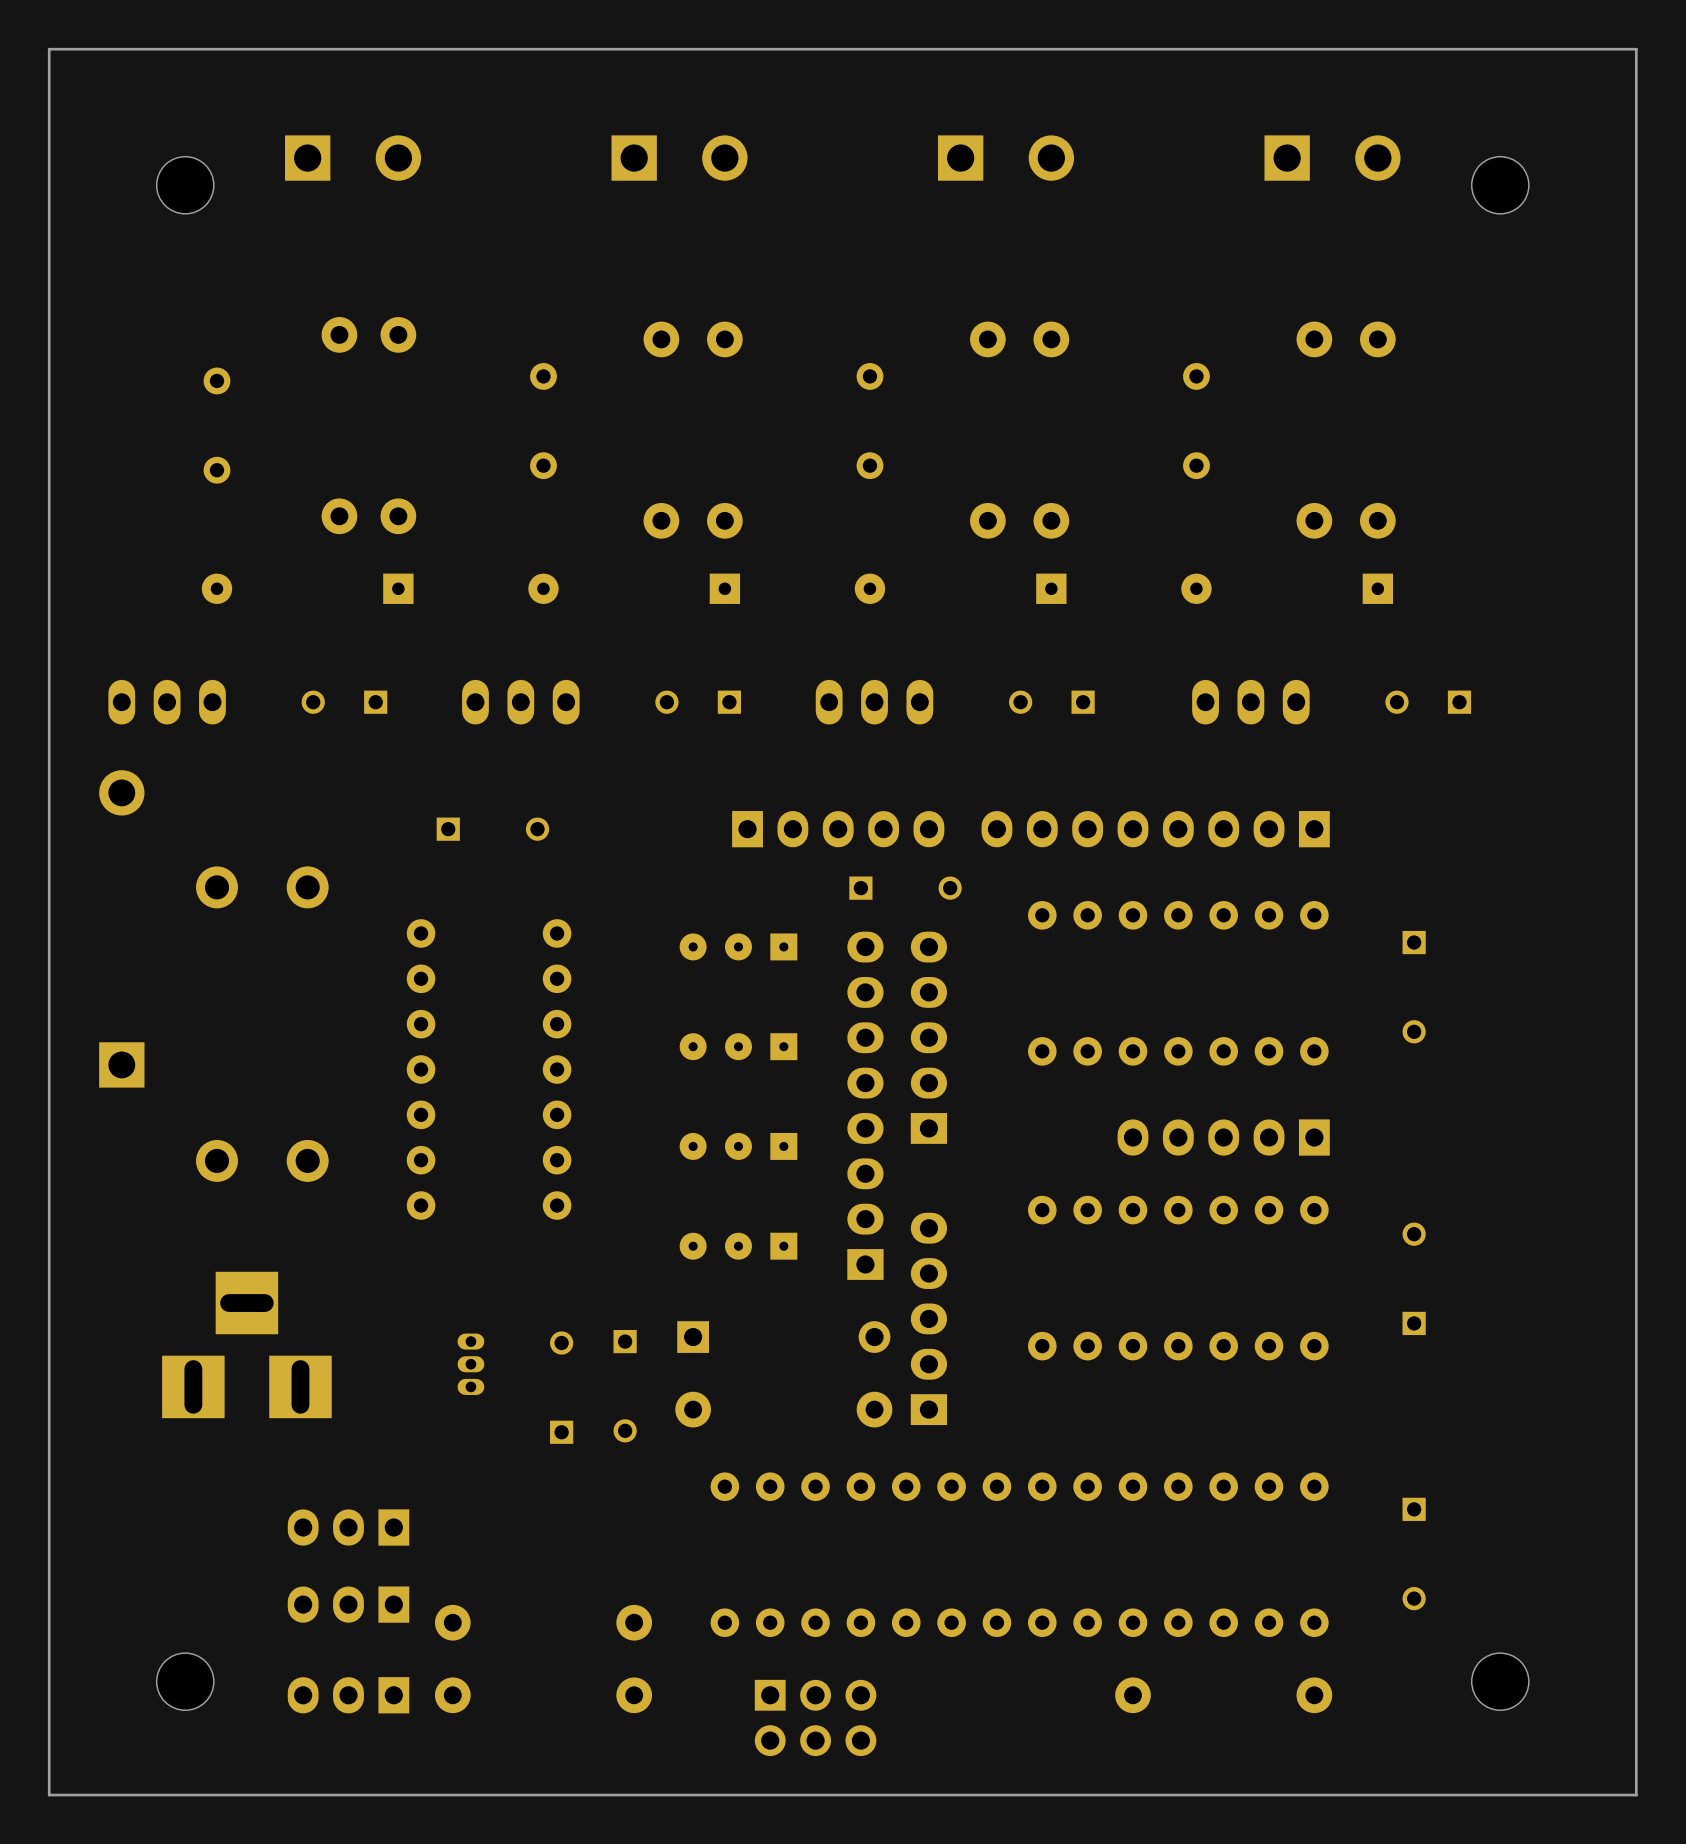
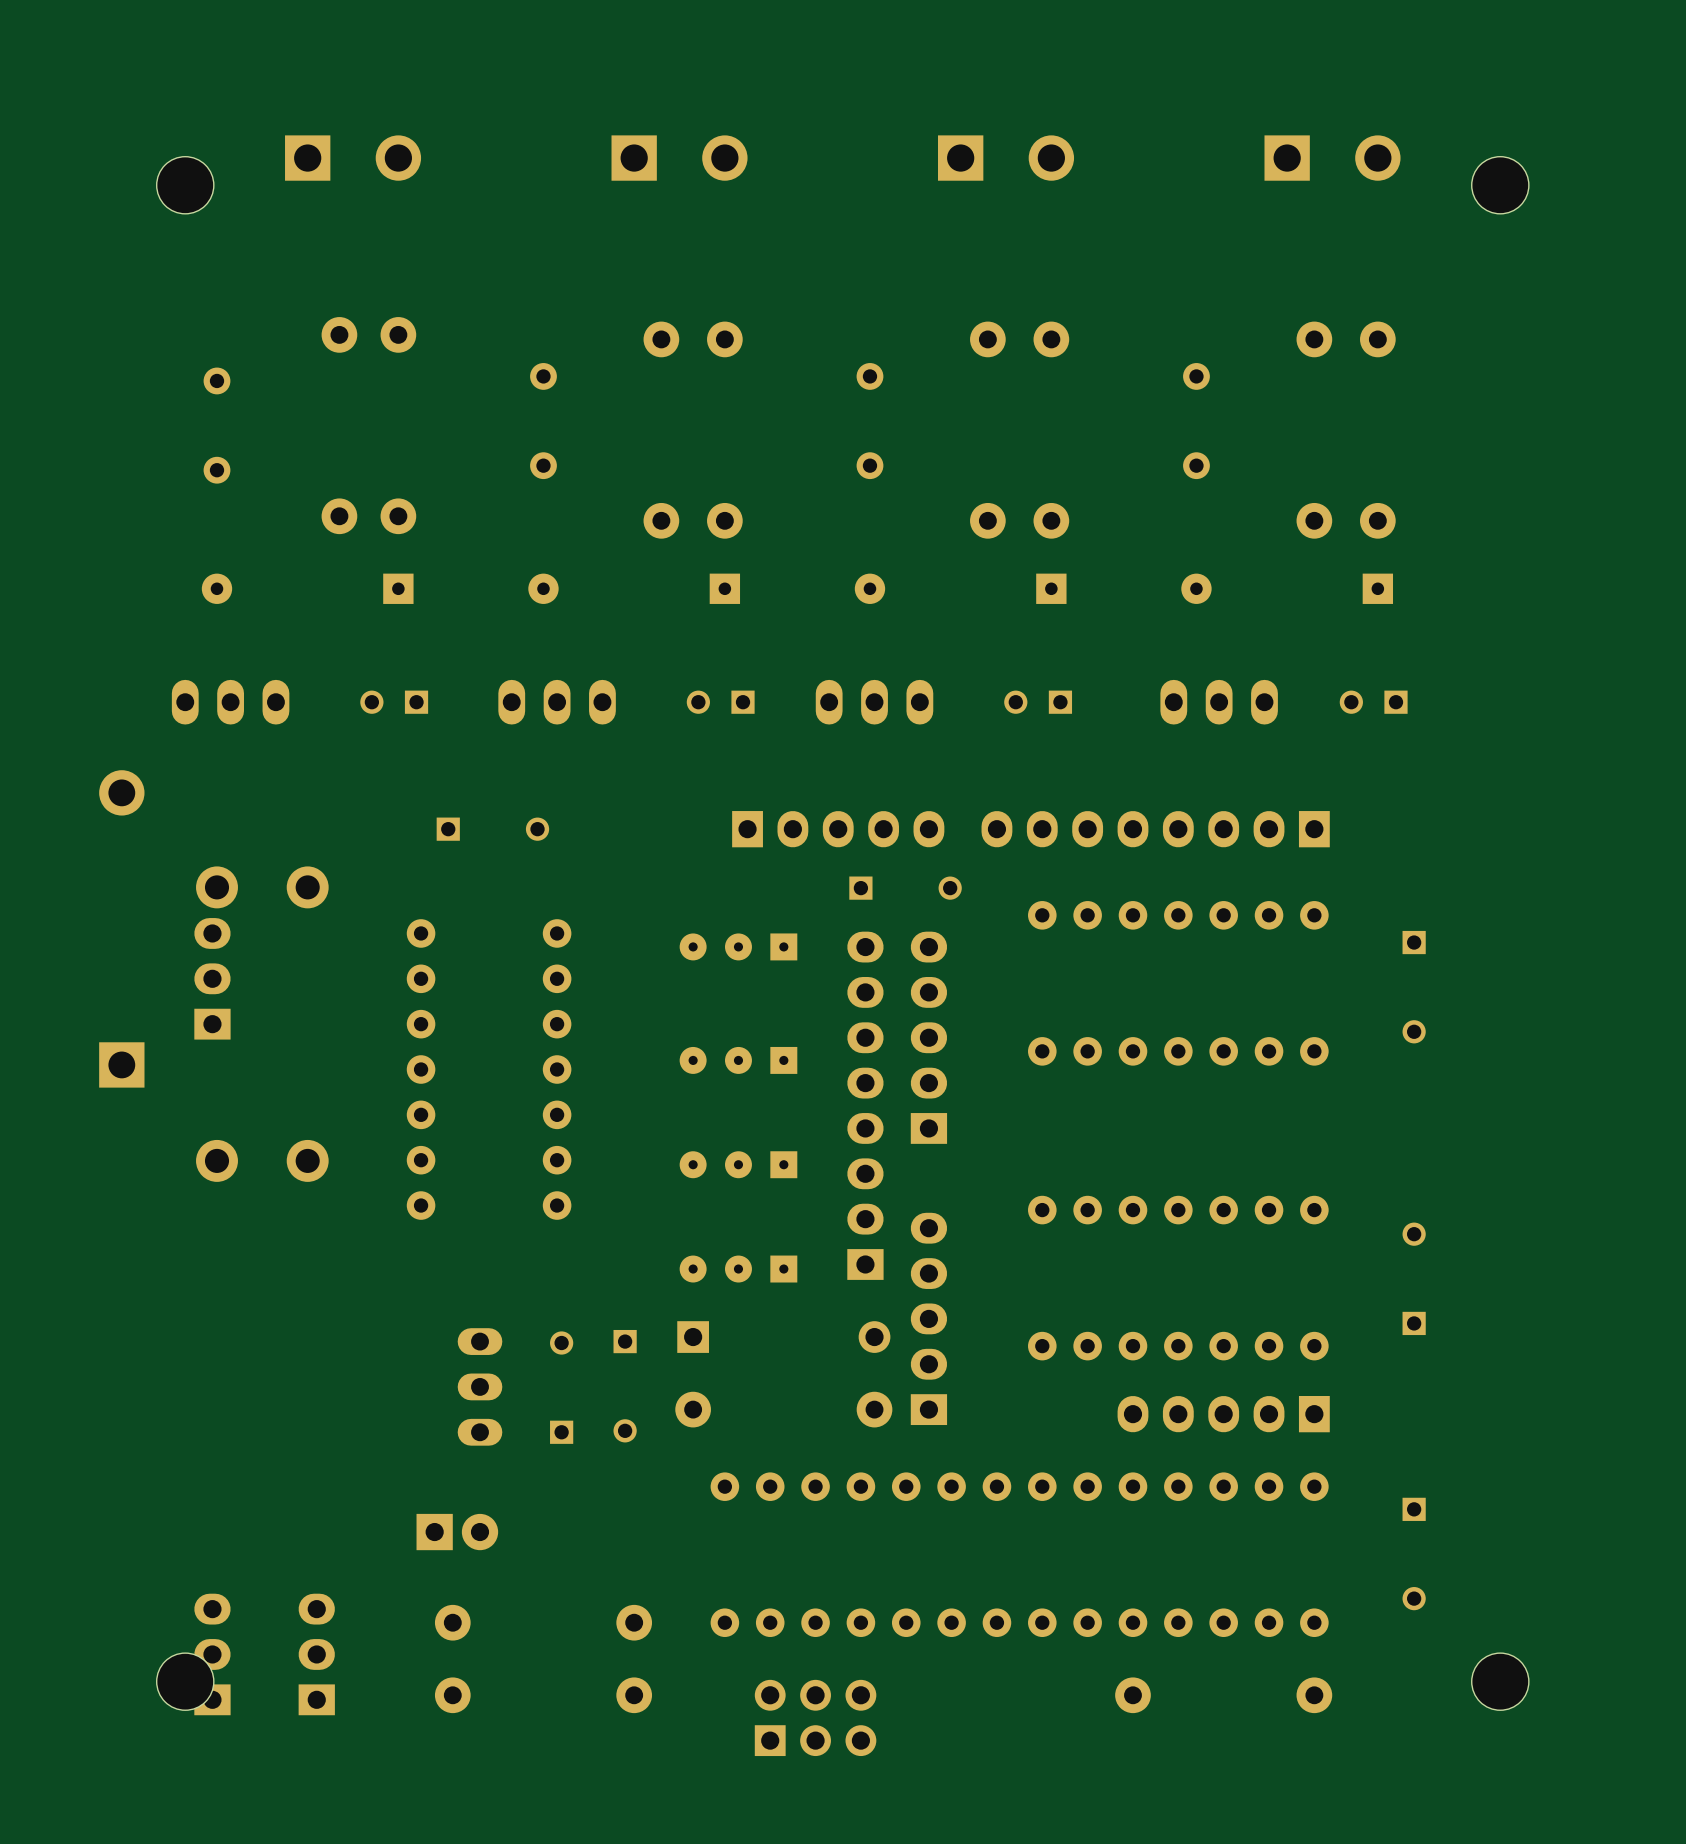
board edge: (1636, 49) (1636, 1795) (49, 1795) (49, 49) (1636, 49) -> none
part footprint: [1009, 690, 1095, 714] -> [1004, 690, 1073, 714]
part position: (167, 702) -> (230, 702)
part: (344, 702) -> none
part: none -> (394, 702)
part position: (520, 702) -> (557, 702)
part: (698, 702) -> none
part: none -> (720, 702)
part position: (1250, 702) -> (1219, 702)
part: none -> (1373, 702)
part: (1428, 702) -> none
part: none -> (212, 978)
part position: (738, 1046) -> (738, 1060)
part position: (1223, 1137) -> (1223, 1414)
part position: (738, 1146) -> (738, 1164)
part position: (738, 1246) -> (738, 1269)
part: (246, 1344) -> none
part: (470, 1364) -> none
part: none -> (480, 1386)
part: (348, 1527) -> none
part: none -> (457, 1532)
part: (348, 1604) -> none
part: none -> (212, 1654)
part: none -> (316, 1654)
part footprint: [754, 1679, 877, 1757] -> [754, 1679, 877, 1757]
part: (348, 1695) -> none

